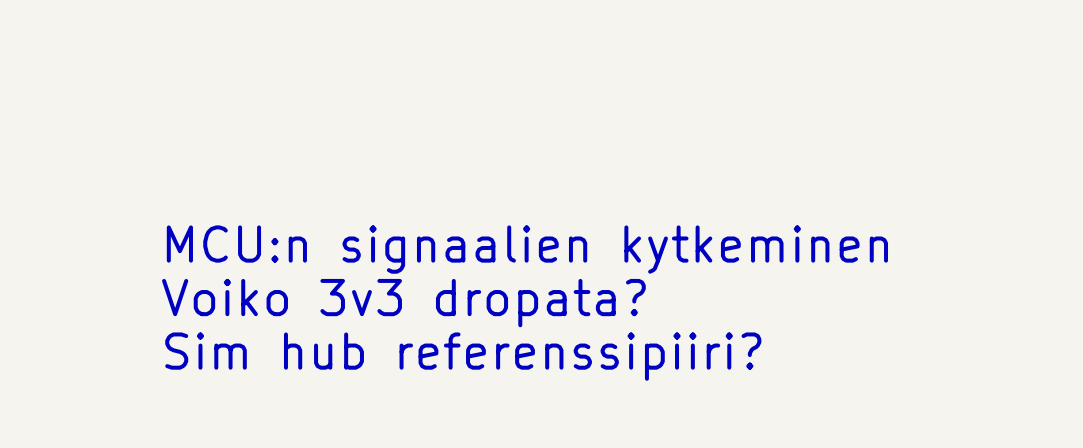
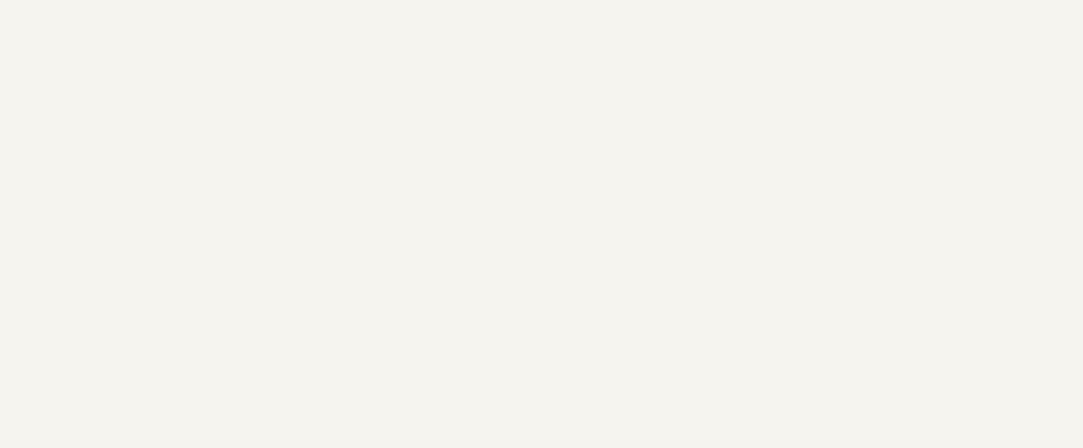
text: MCU:n signaalien kytkeminen (527, 249) -> none
text: Voiko 3v3 dropata? (403, 303) -> none
text: Sim hub referenssipiiri? (463, 356) -> none

